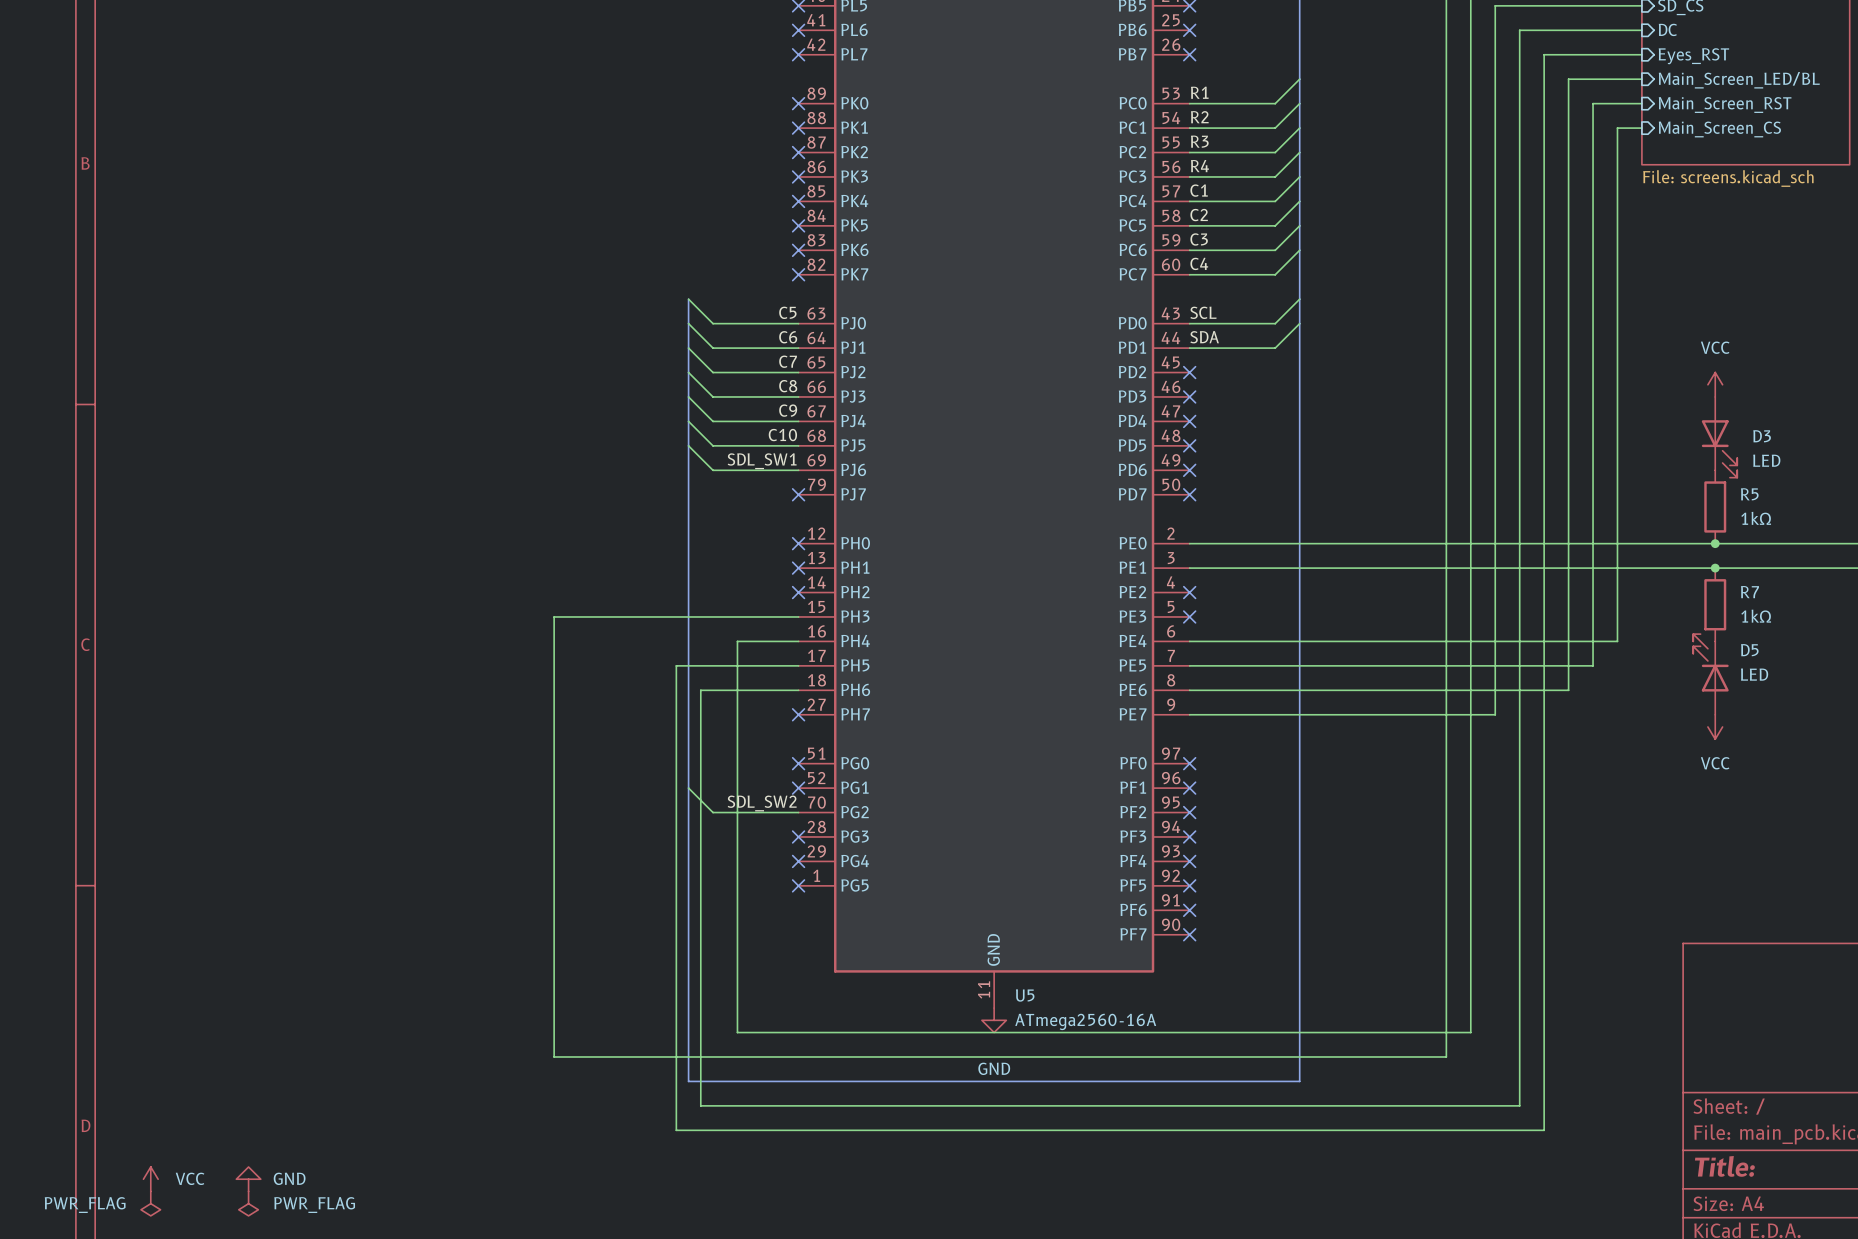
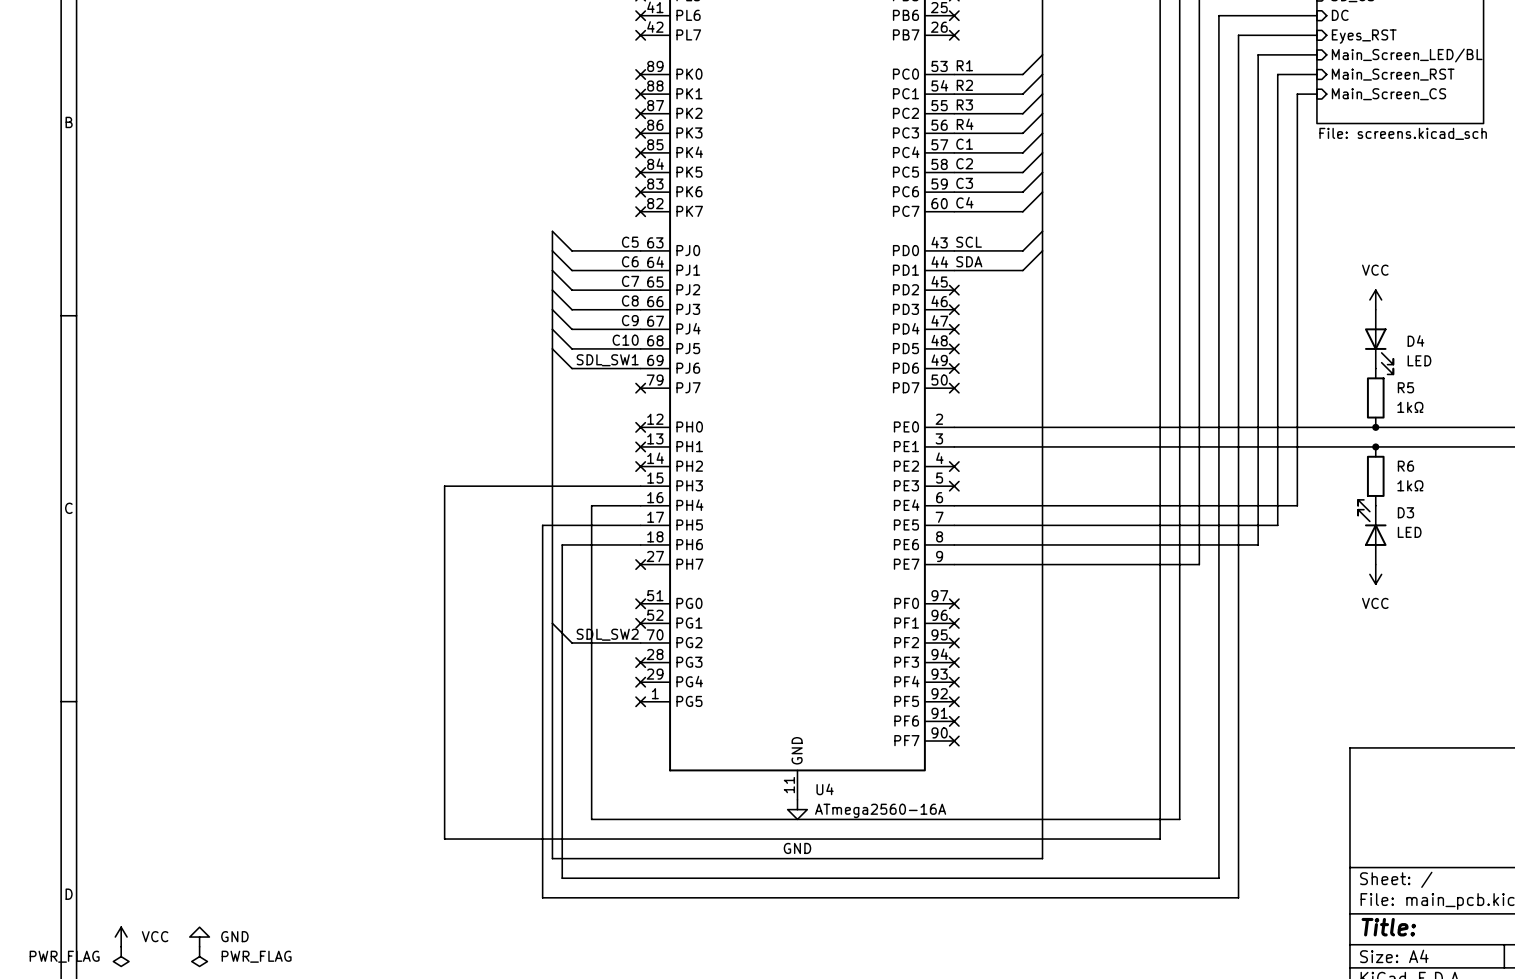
D3 name: D3 (1762, 436) -> D4 (1415, 340)
R7 name: R7 (1749, 592) -> R6 (1405, 466)
D5 name: D5 (1749, 650) -> D3 (1405, 512)
U5 name: U5 (1025, 995) -> U4 (825, 789)

